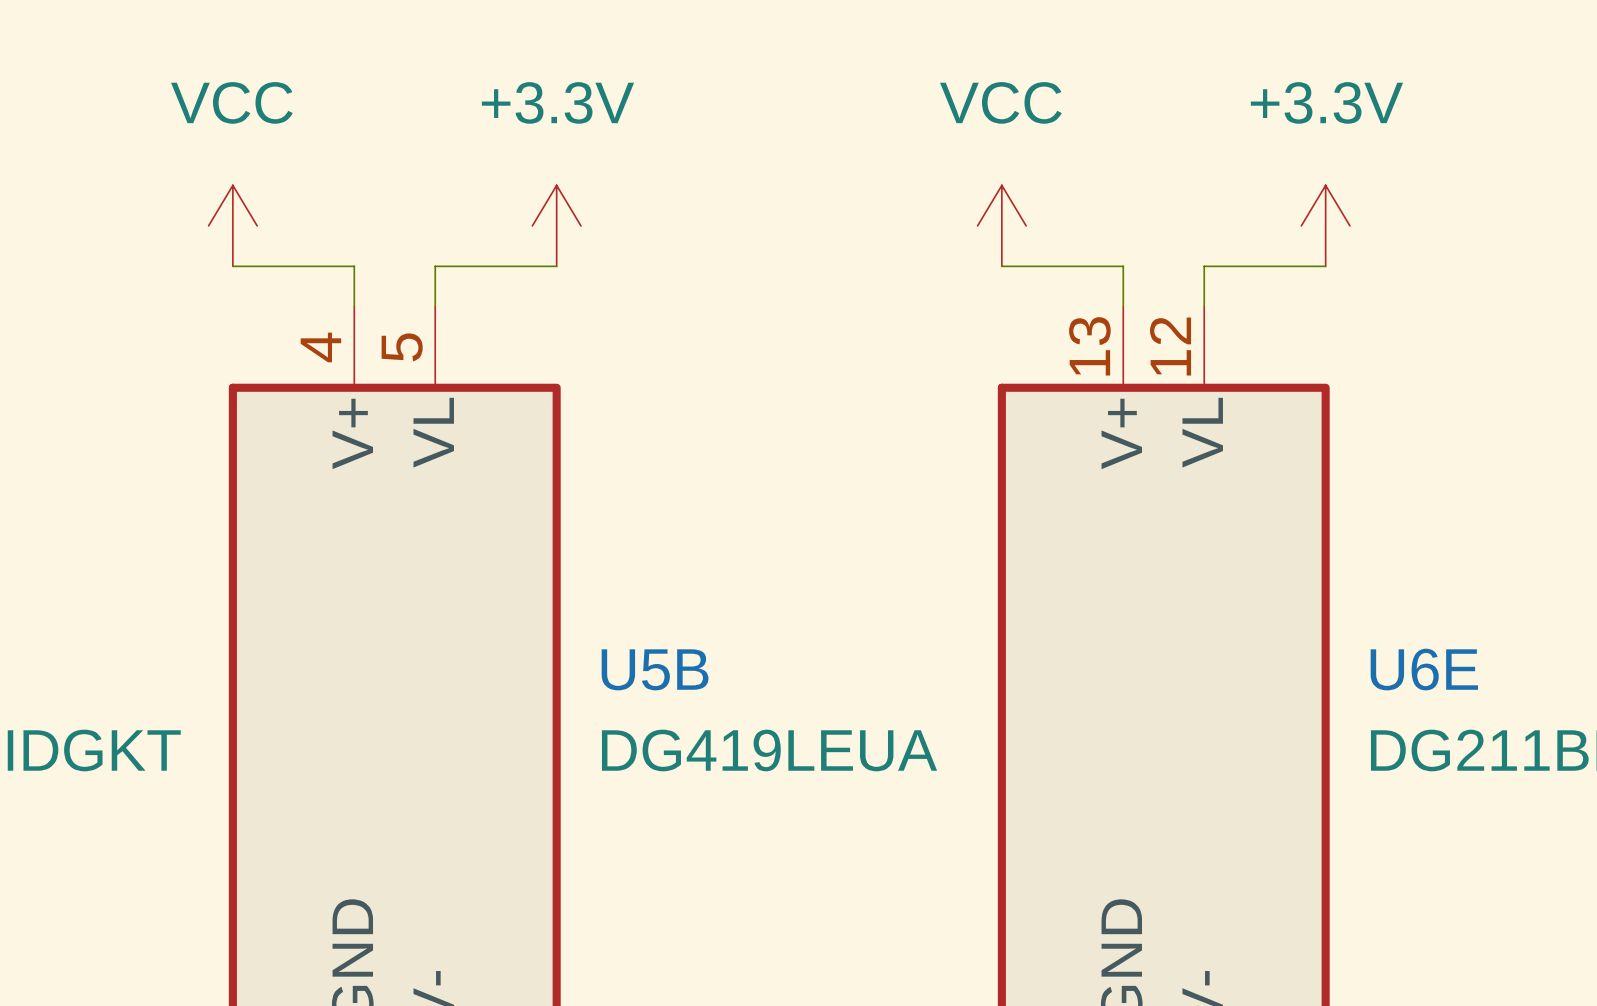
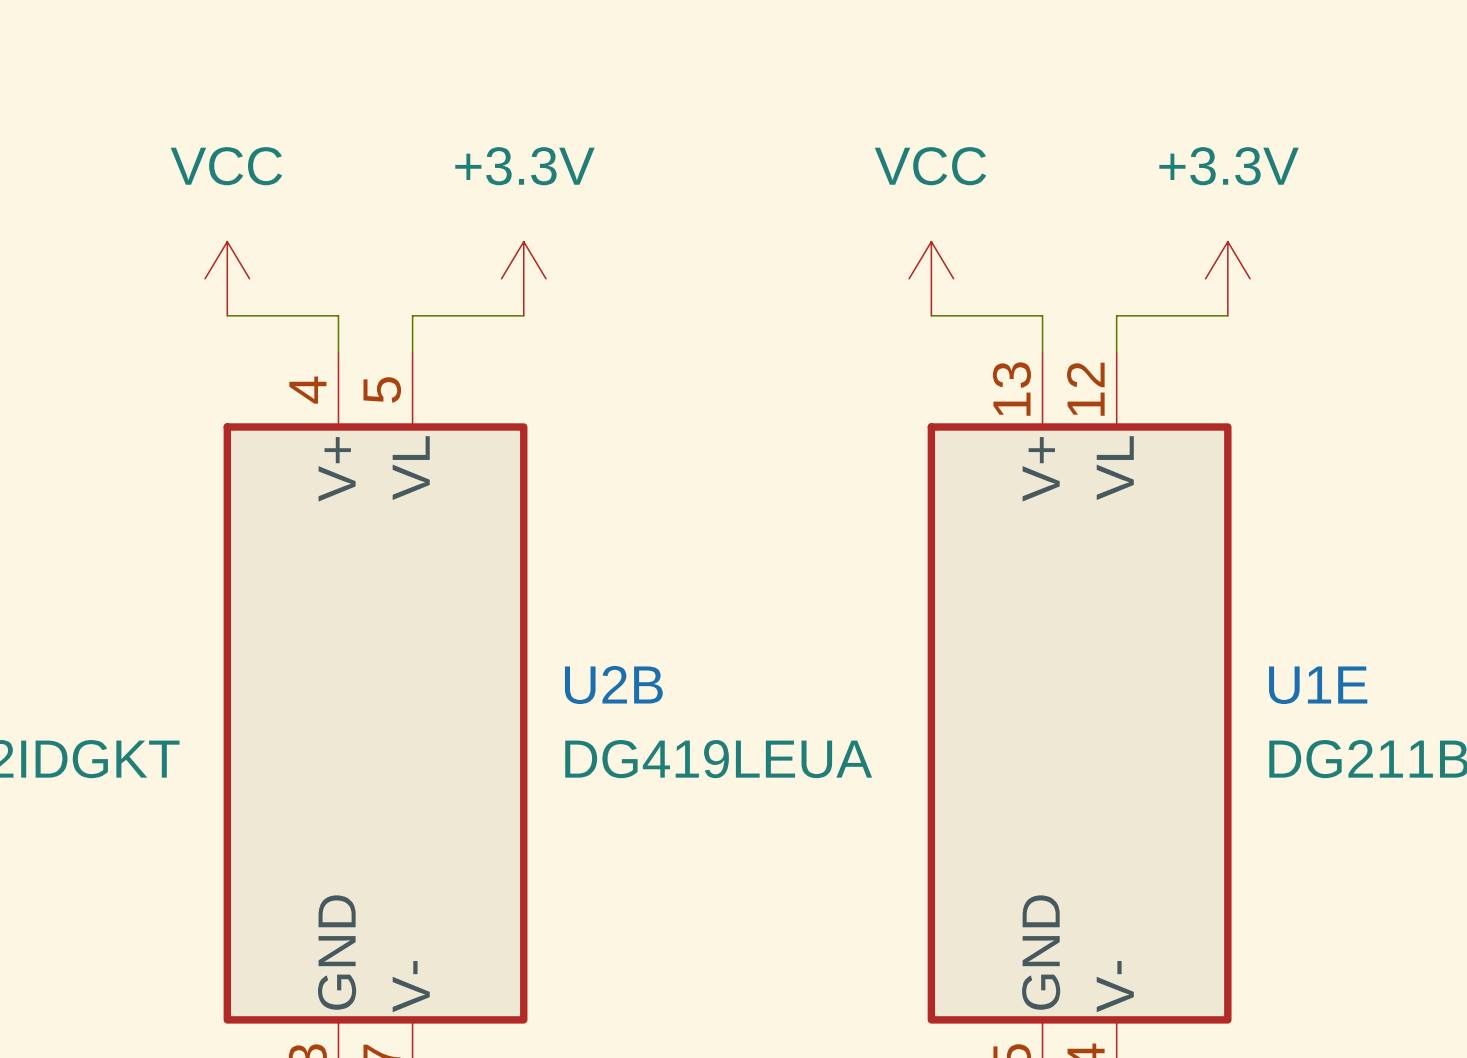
U5B name: U5B (655, 669) -> U2B (613, 684)
U6E name: U6E (1424, 669) -> U1E (1318, 685)

